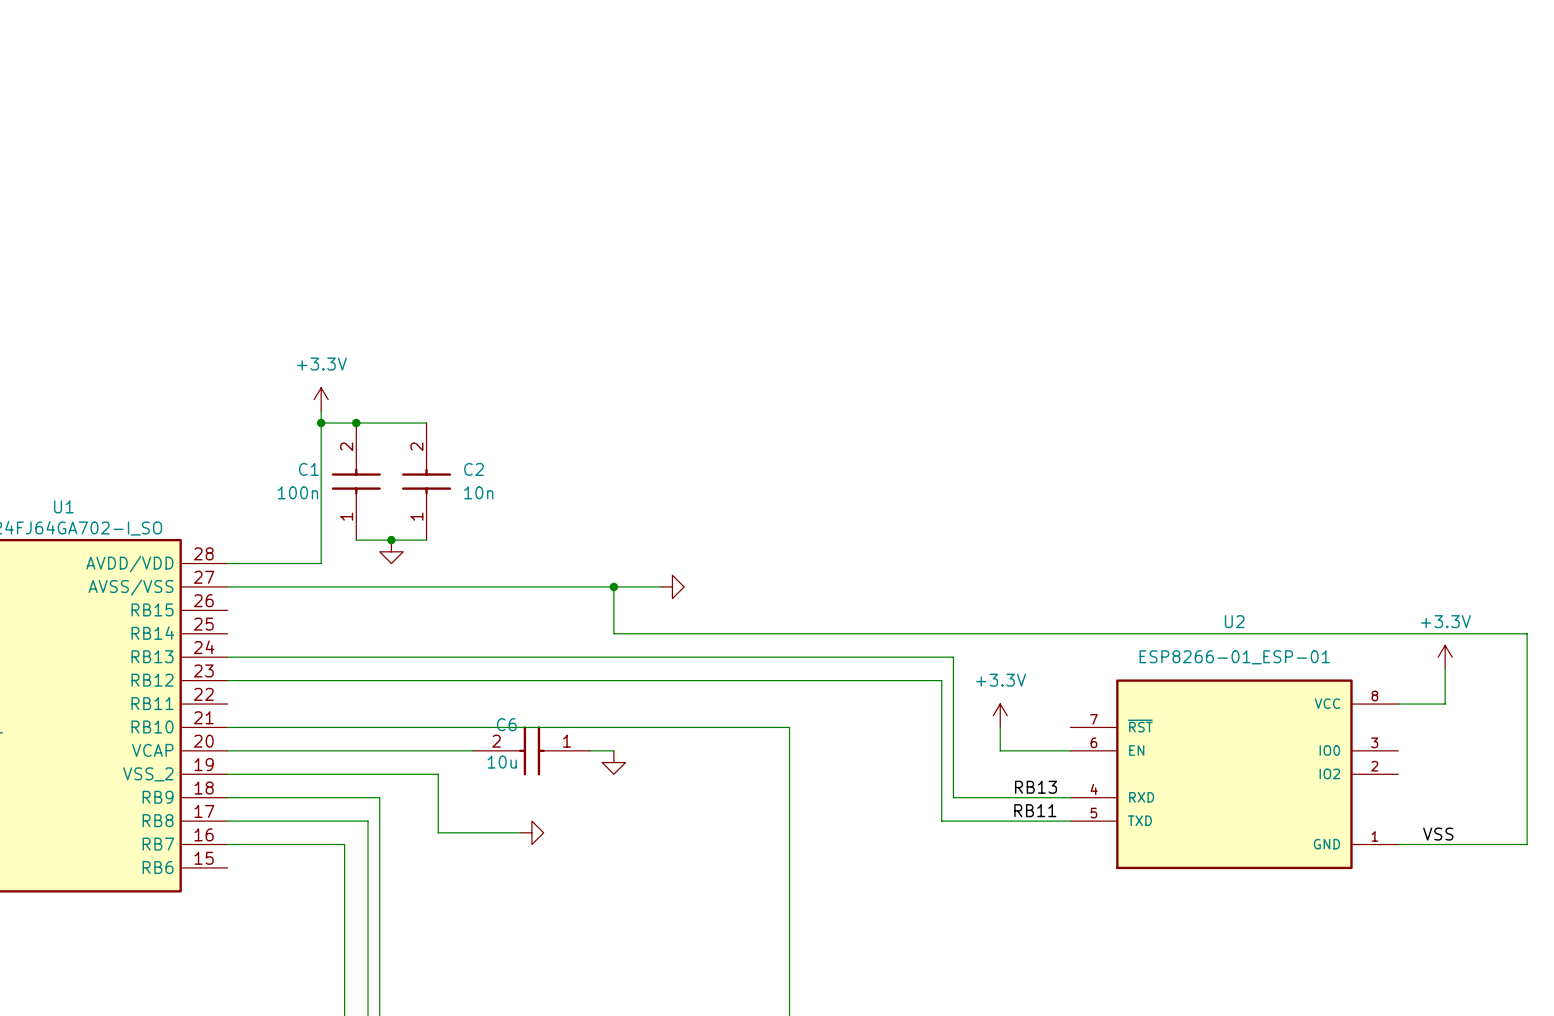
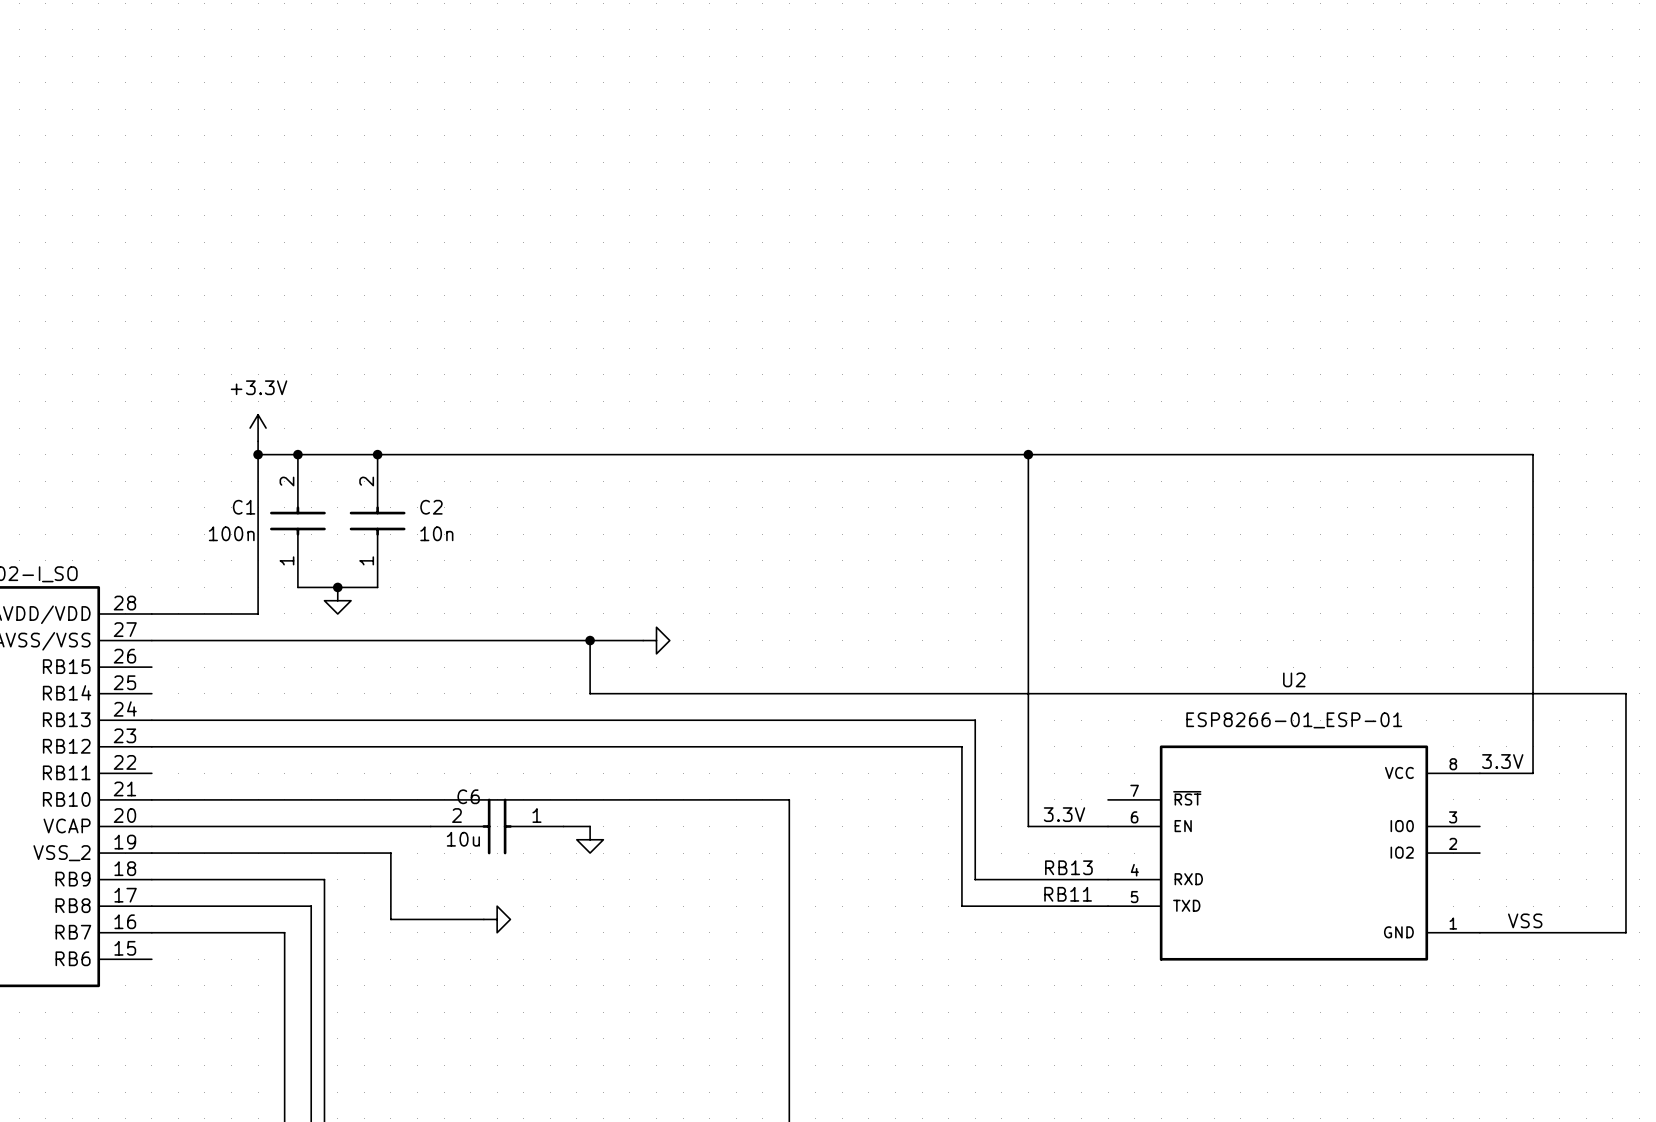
wire: none -> (377, 454) (1533, 454) (1533, 733)
junction: none -> (377, 454)
wire: none -> (1028, 454) (1028, 799)
junction: none -> (1028, 454)
power symbol: +3.3V (1445, 657) -> none
label: none -> 3.3V (1502, 761)
power symbol: +3.3V (1000, 715) -> none
label: none -> 3.3V (1064, 814)

